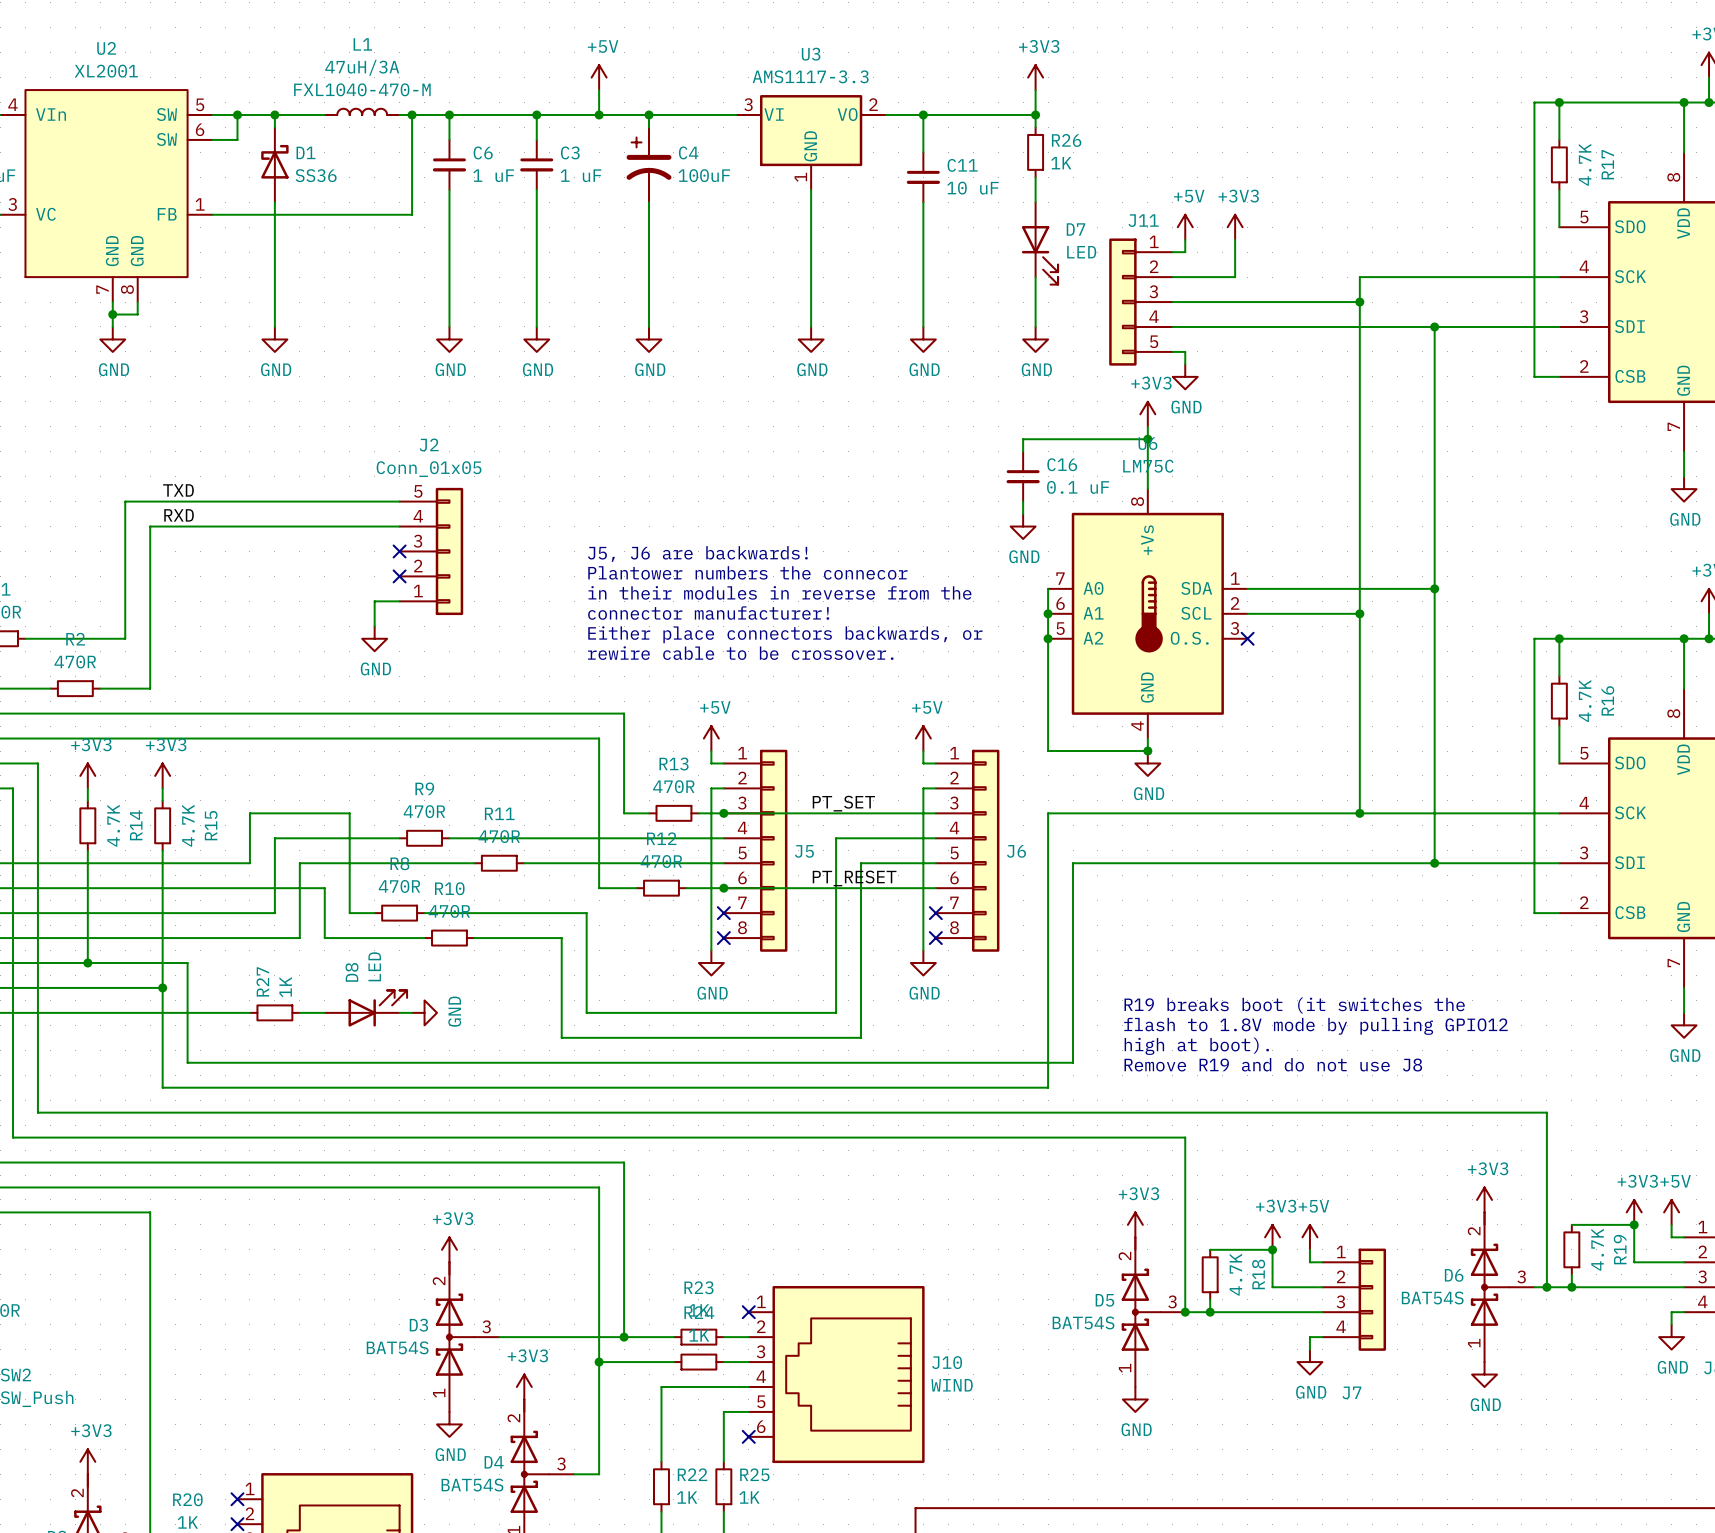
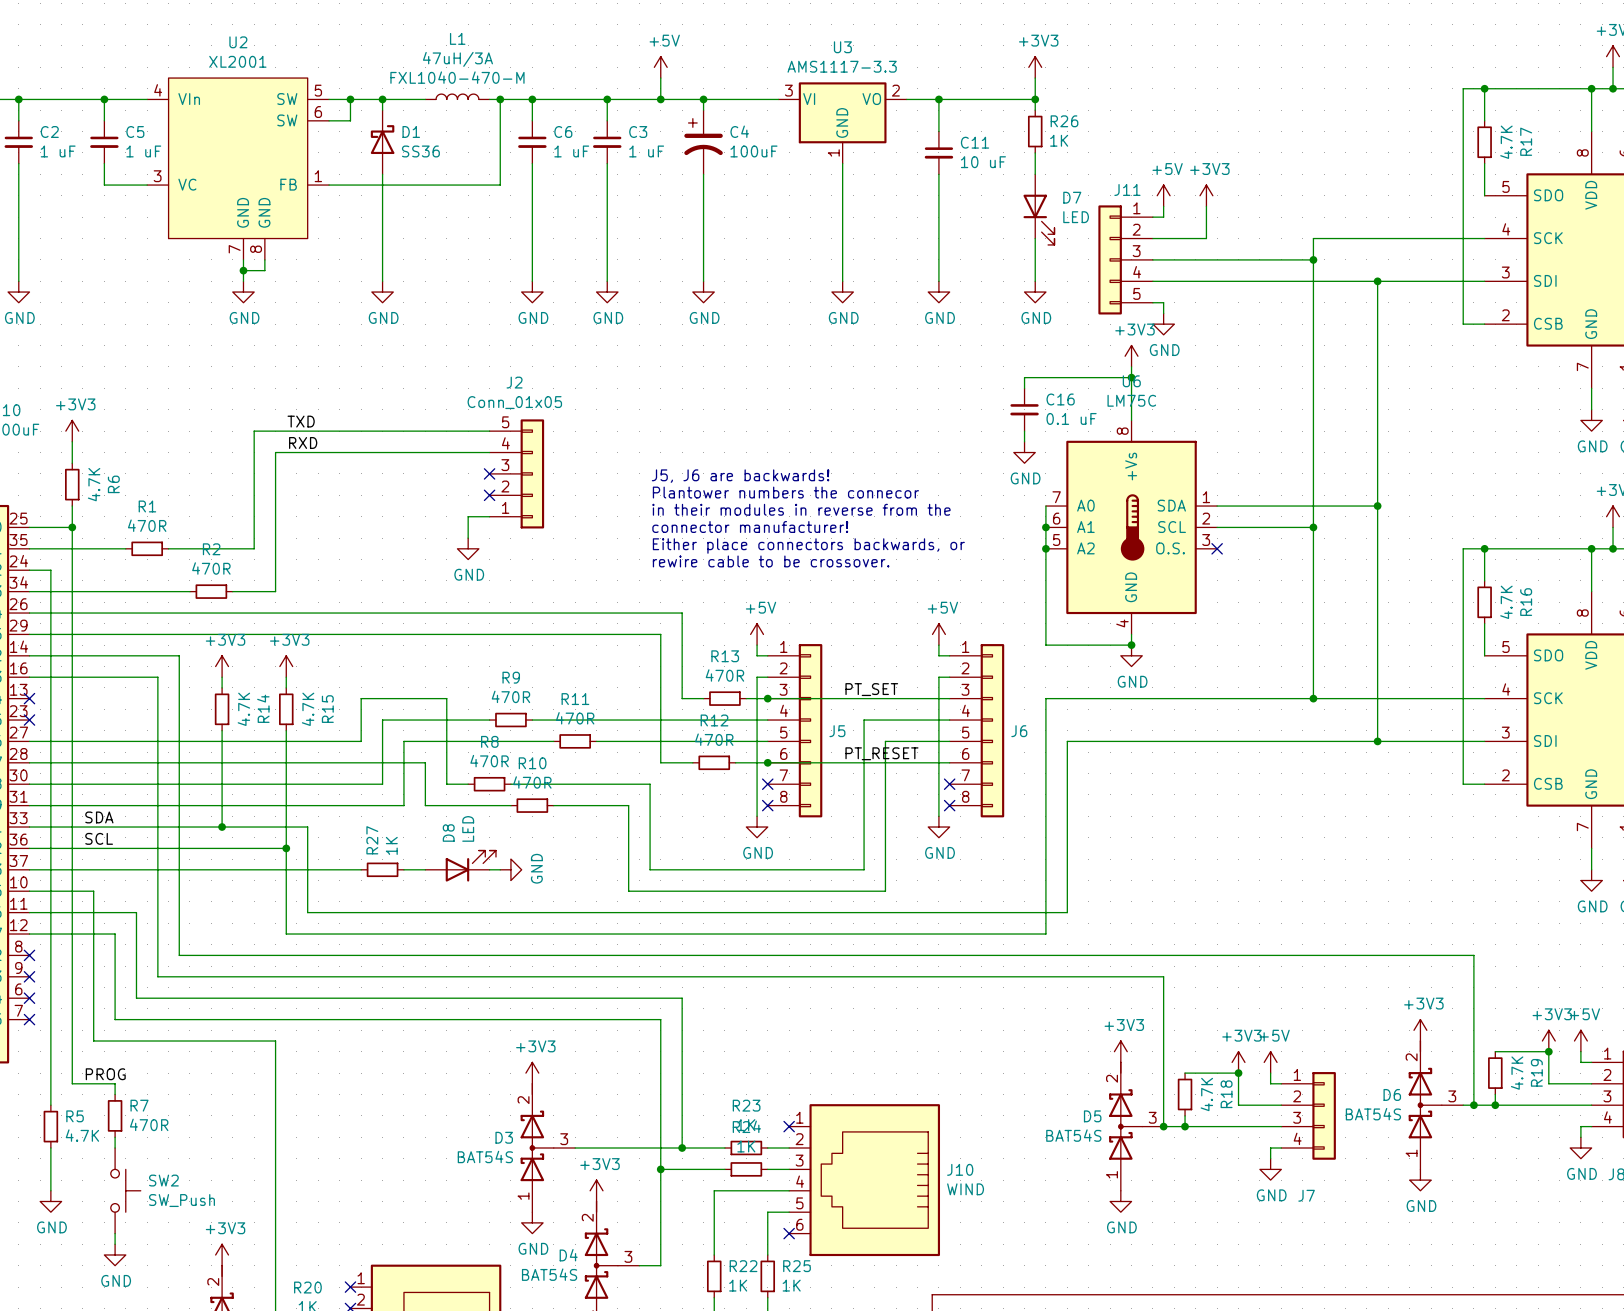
text: R19 breaks boot (it switches the (1294, 1005) -> none
text: flash to 1.8V mode by pulling GPIO12 (1315, 1026) -> none
text: high at boot). (1196, 1046) -> none
text: Remove R19 and do not use J8 (1273, 1064) -> none

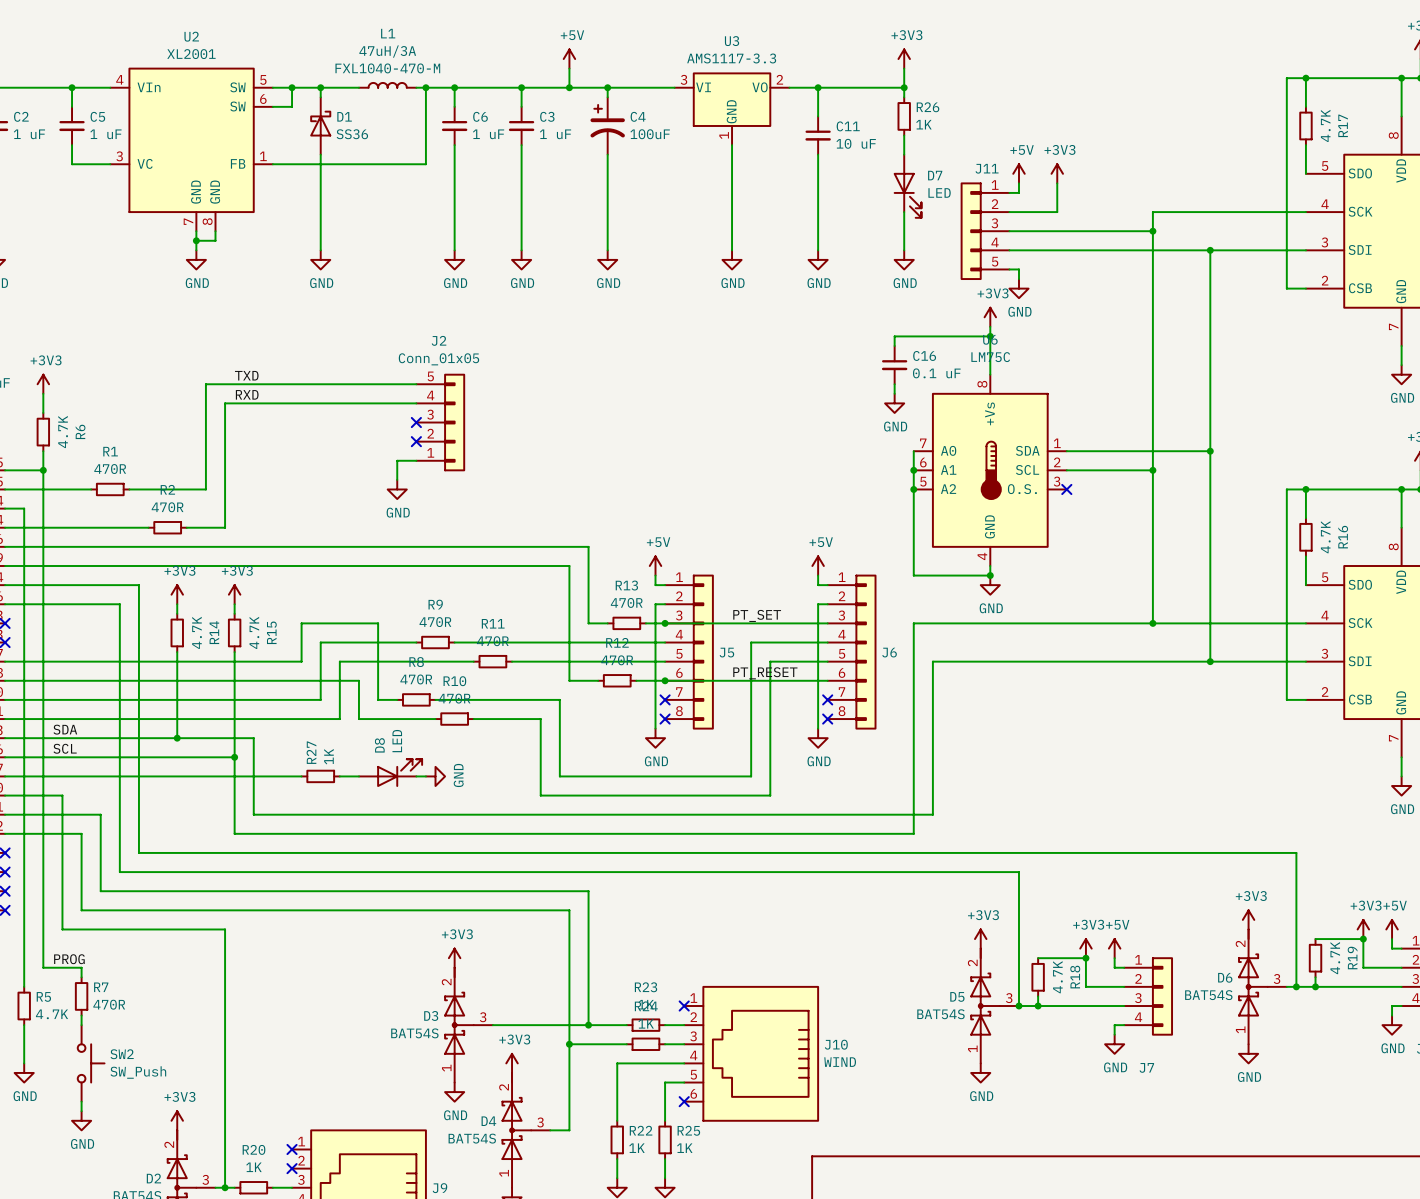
text: J5, J6 are backwards! (740, 476) -> none
text: Plantower numbers the connecor (785, 492) -> none
text: in their modules in reverse from the (801, 509) -> none
text: connector manufacturer! (750, 527) -> none
text: Either place connectors backwards, or (808, 546) -> none
text: rewire cable to be crossover. (771, 561) -> none

